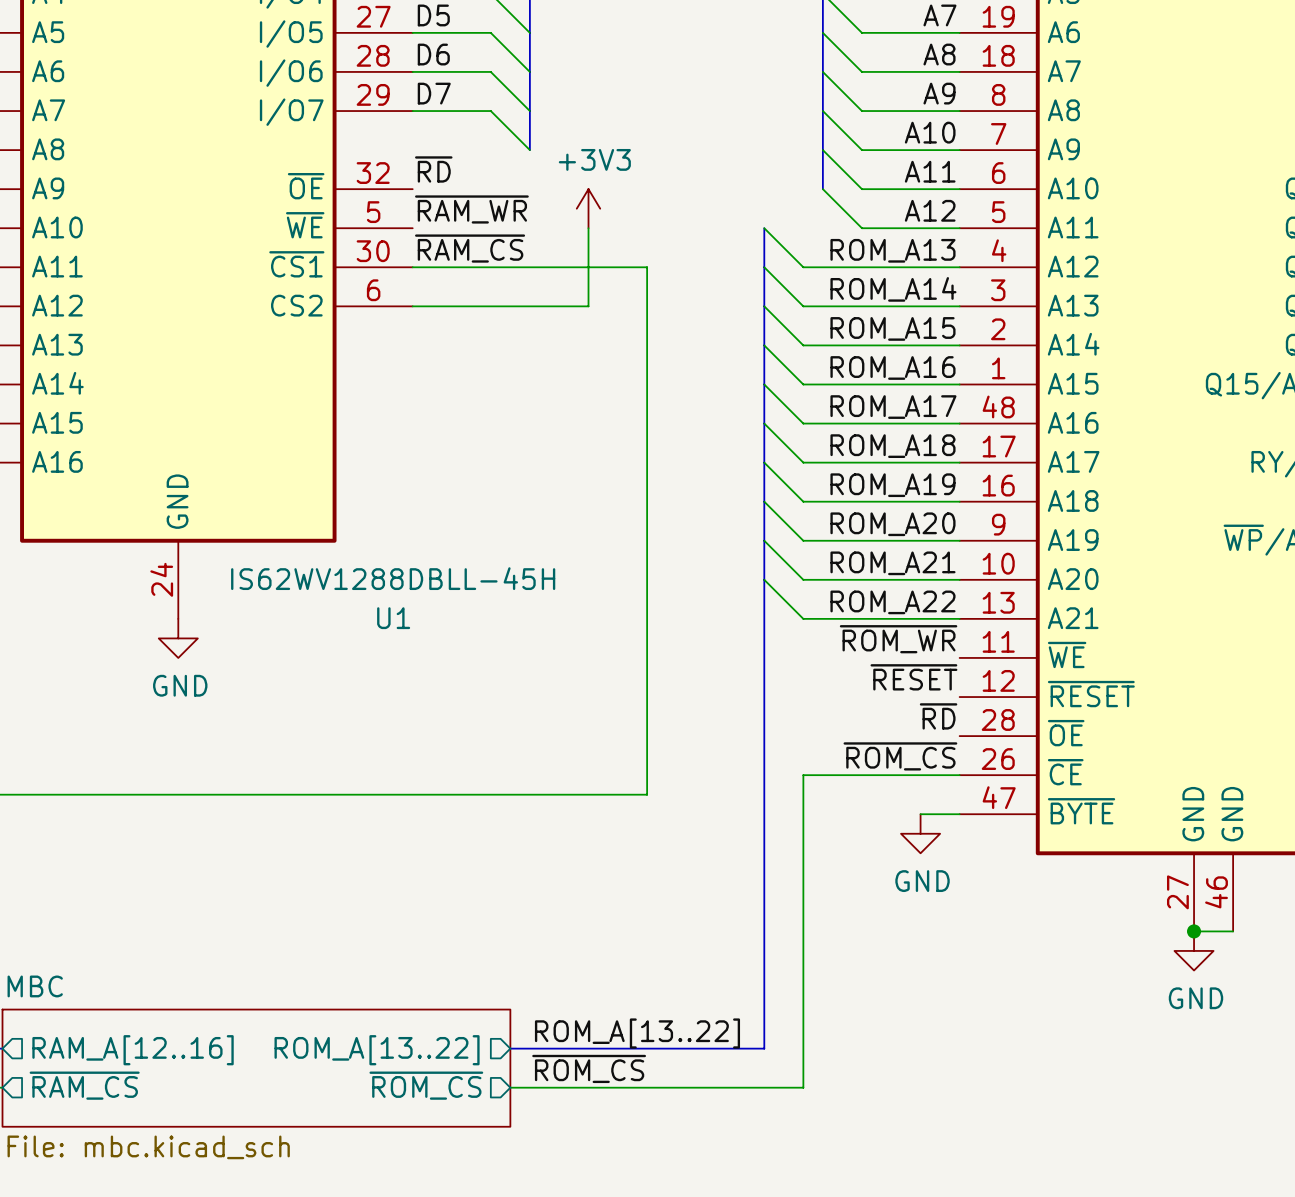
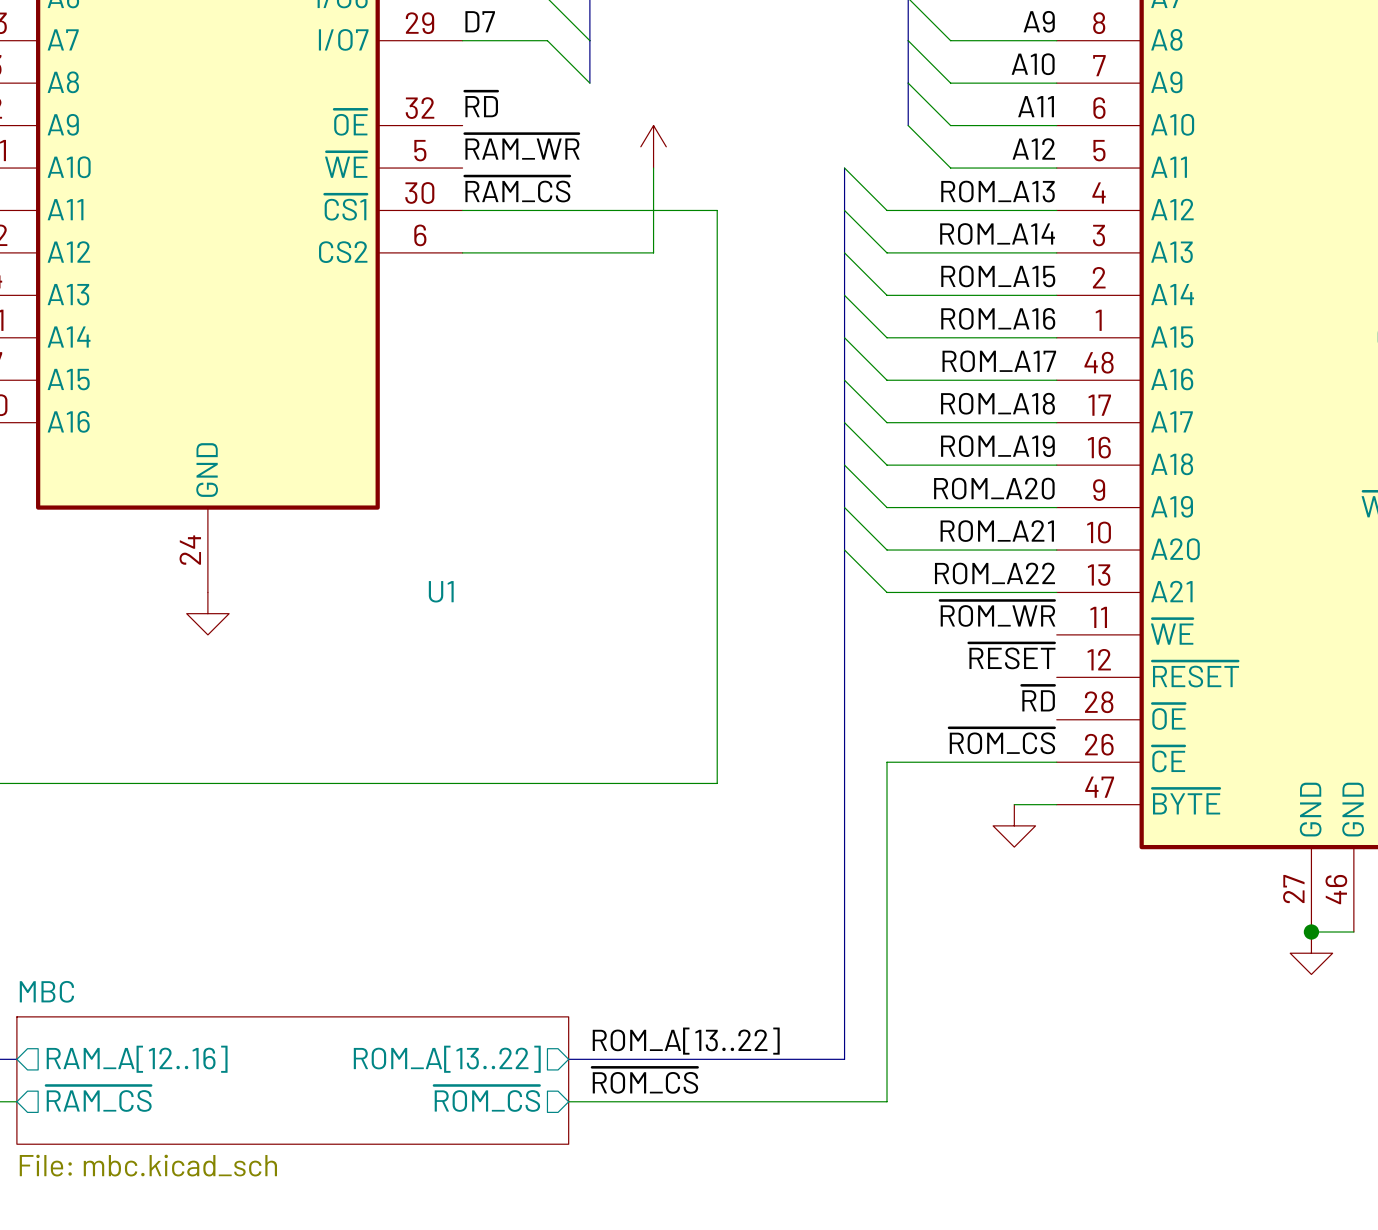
power symbol text: +3V3 (594, 159) -> none
U1 value: IS62WV1288DBLL-45H (393, 578) -> none
power symbol text: GND (180, 685) -> none
power symbol text: GND (922, 881) -> none
power symbol text: GND (1195, 998) -> none

